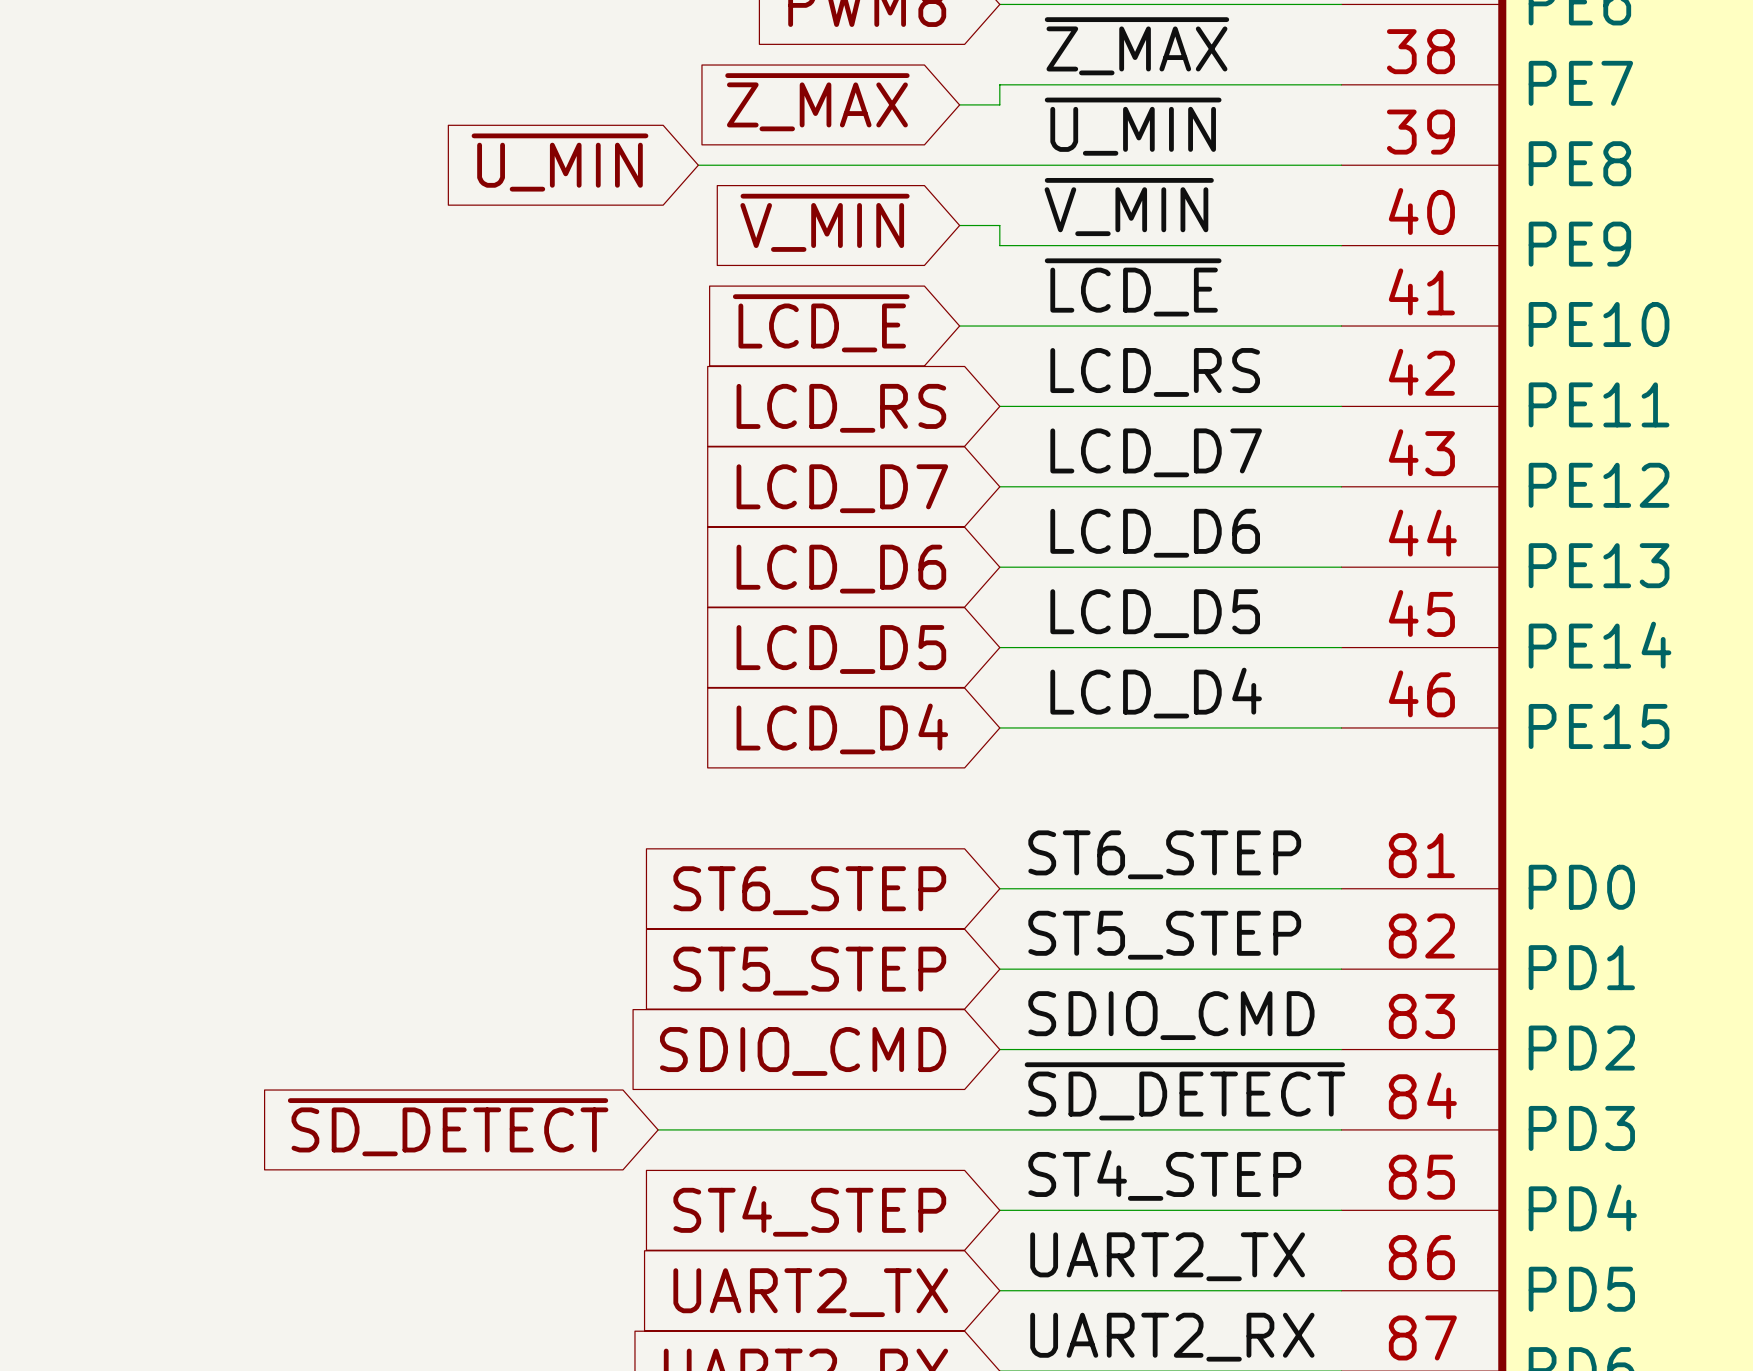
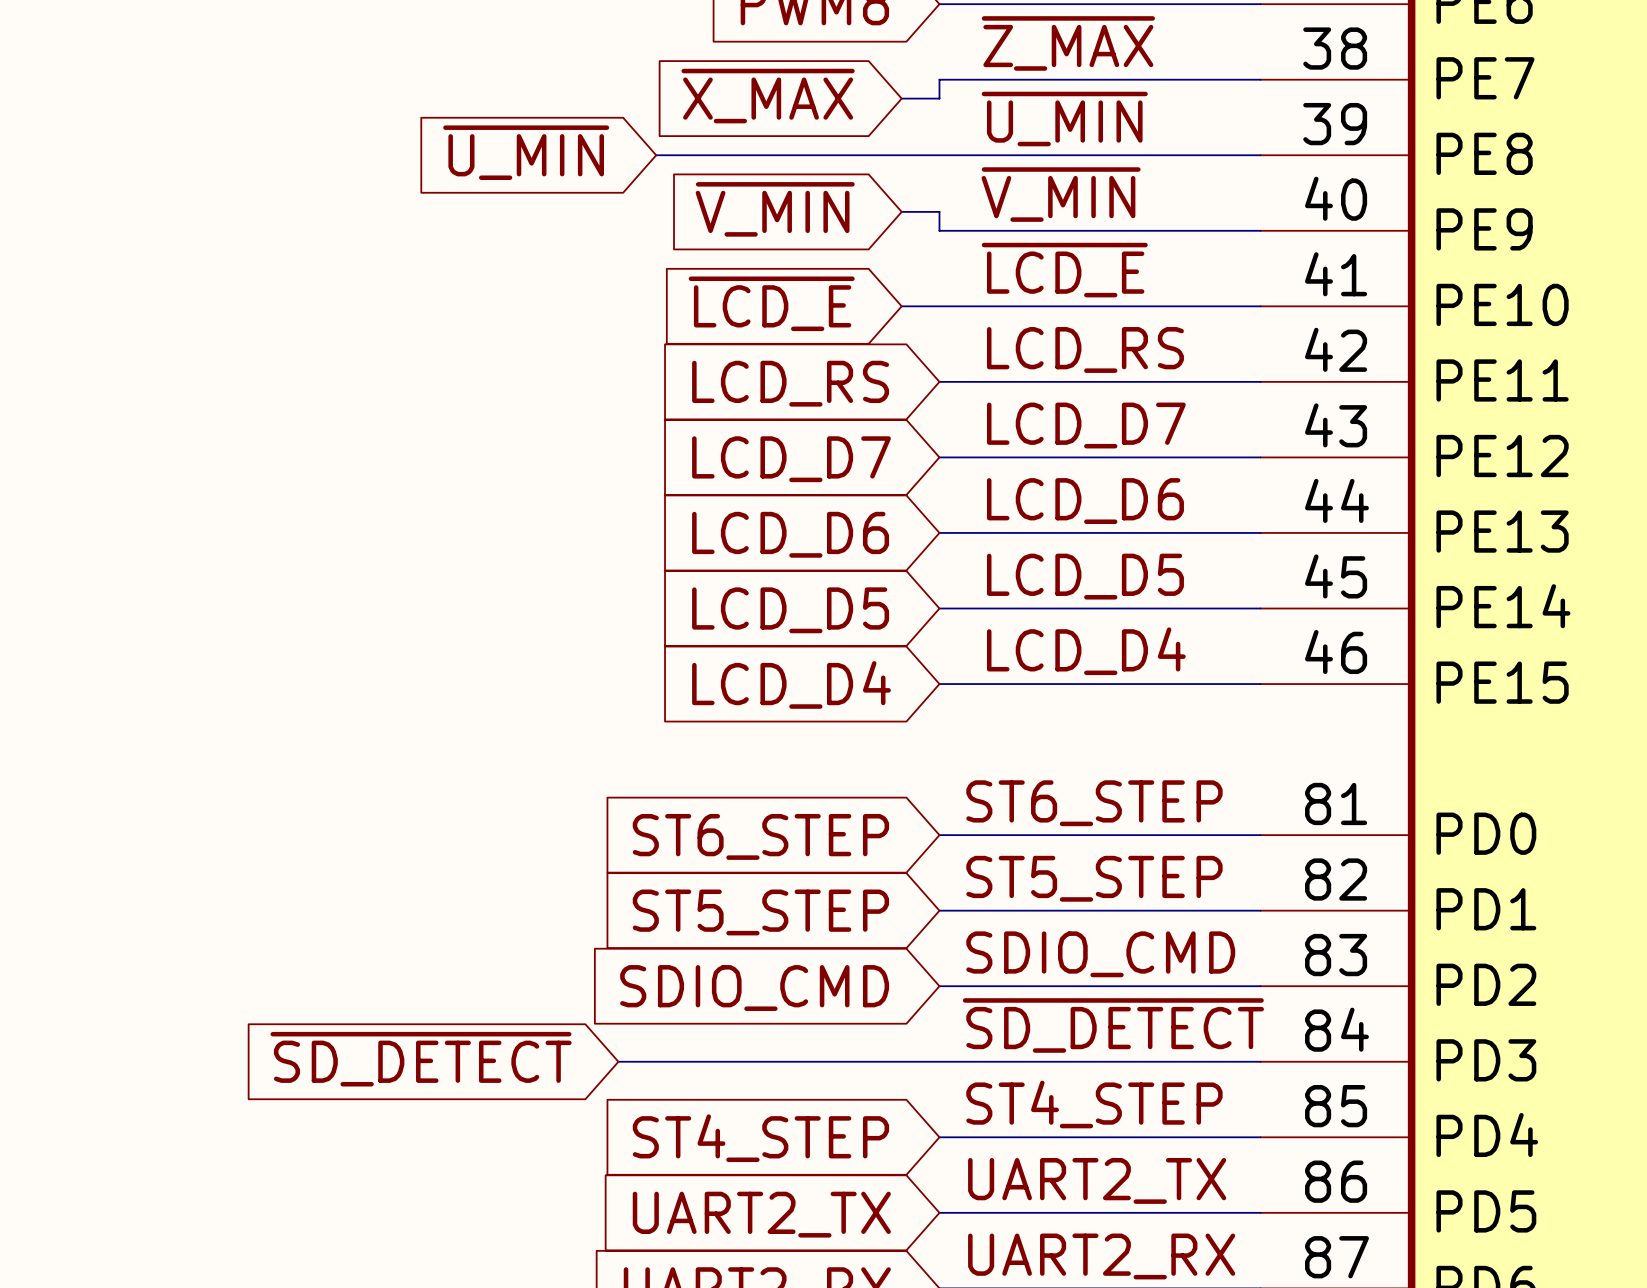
global label: ~{Z_MAX} (817, 102) -> ~{X_MAX} (768, 96)

